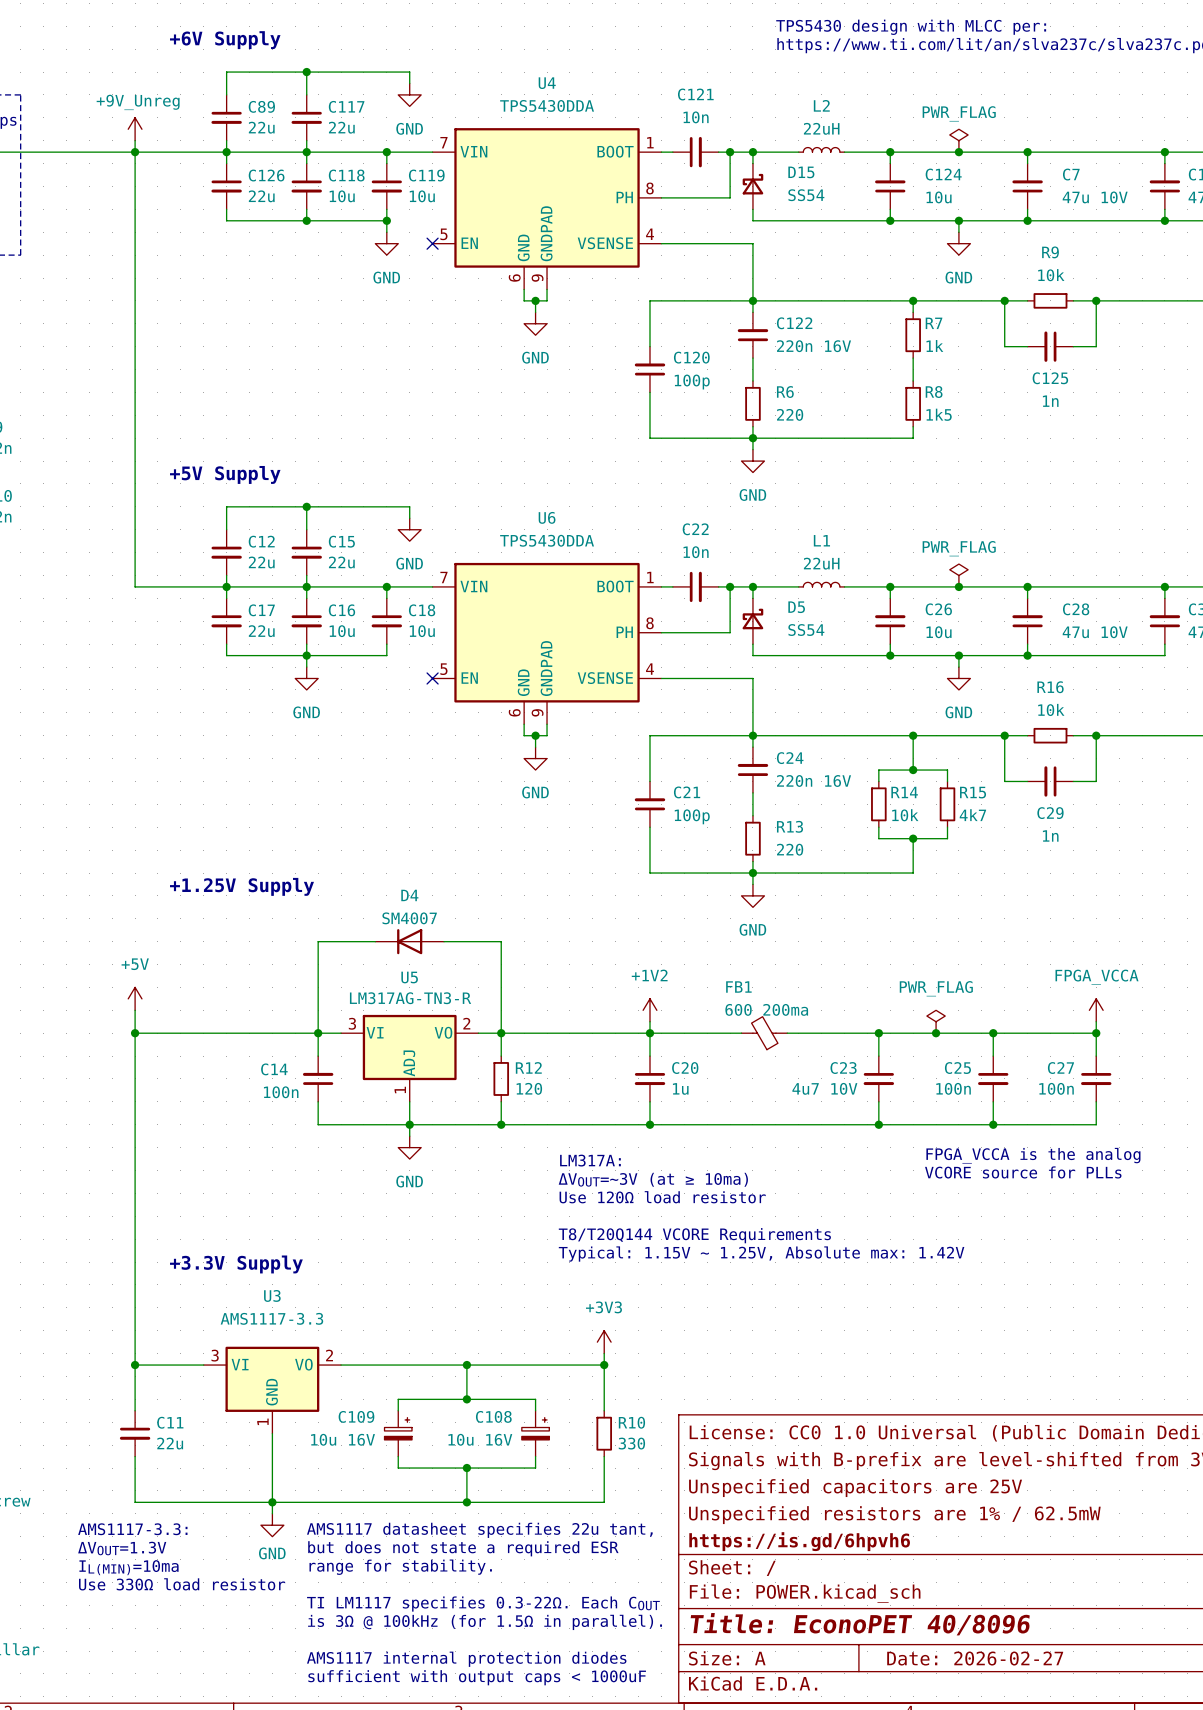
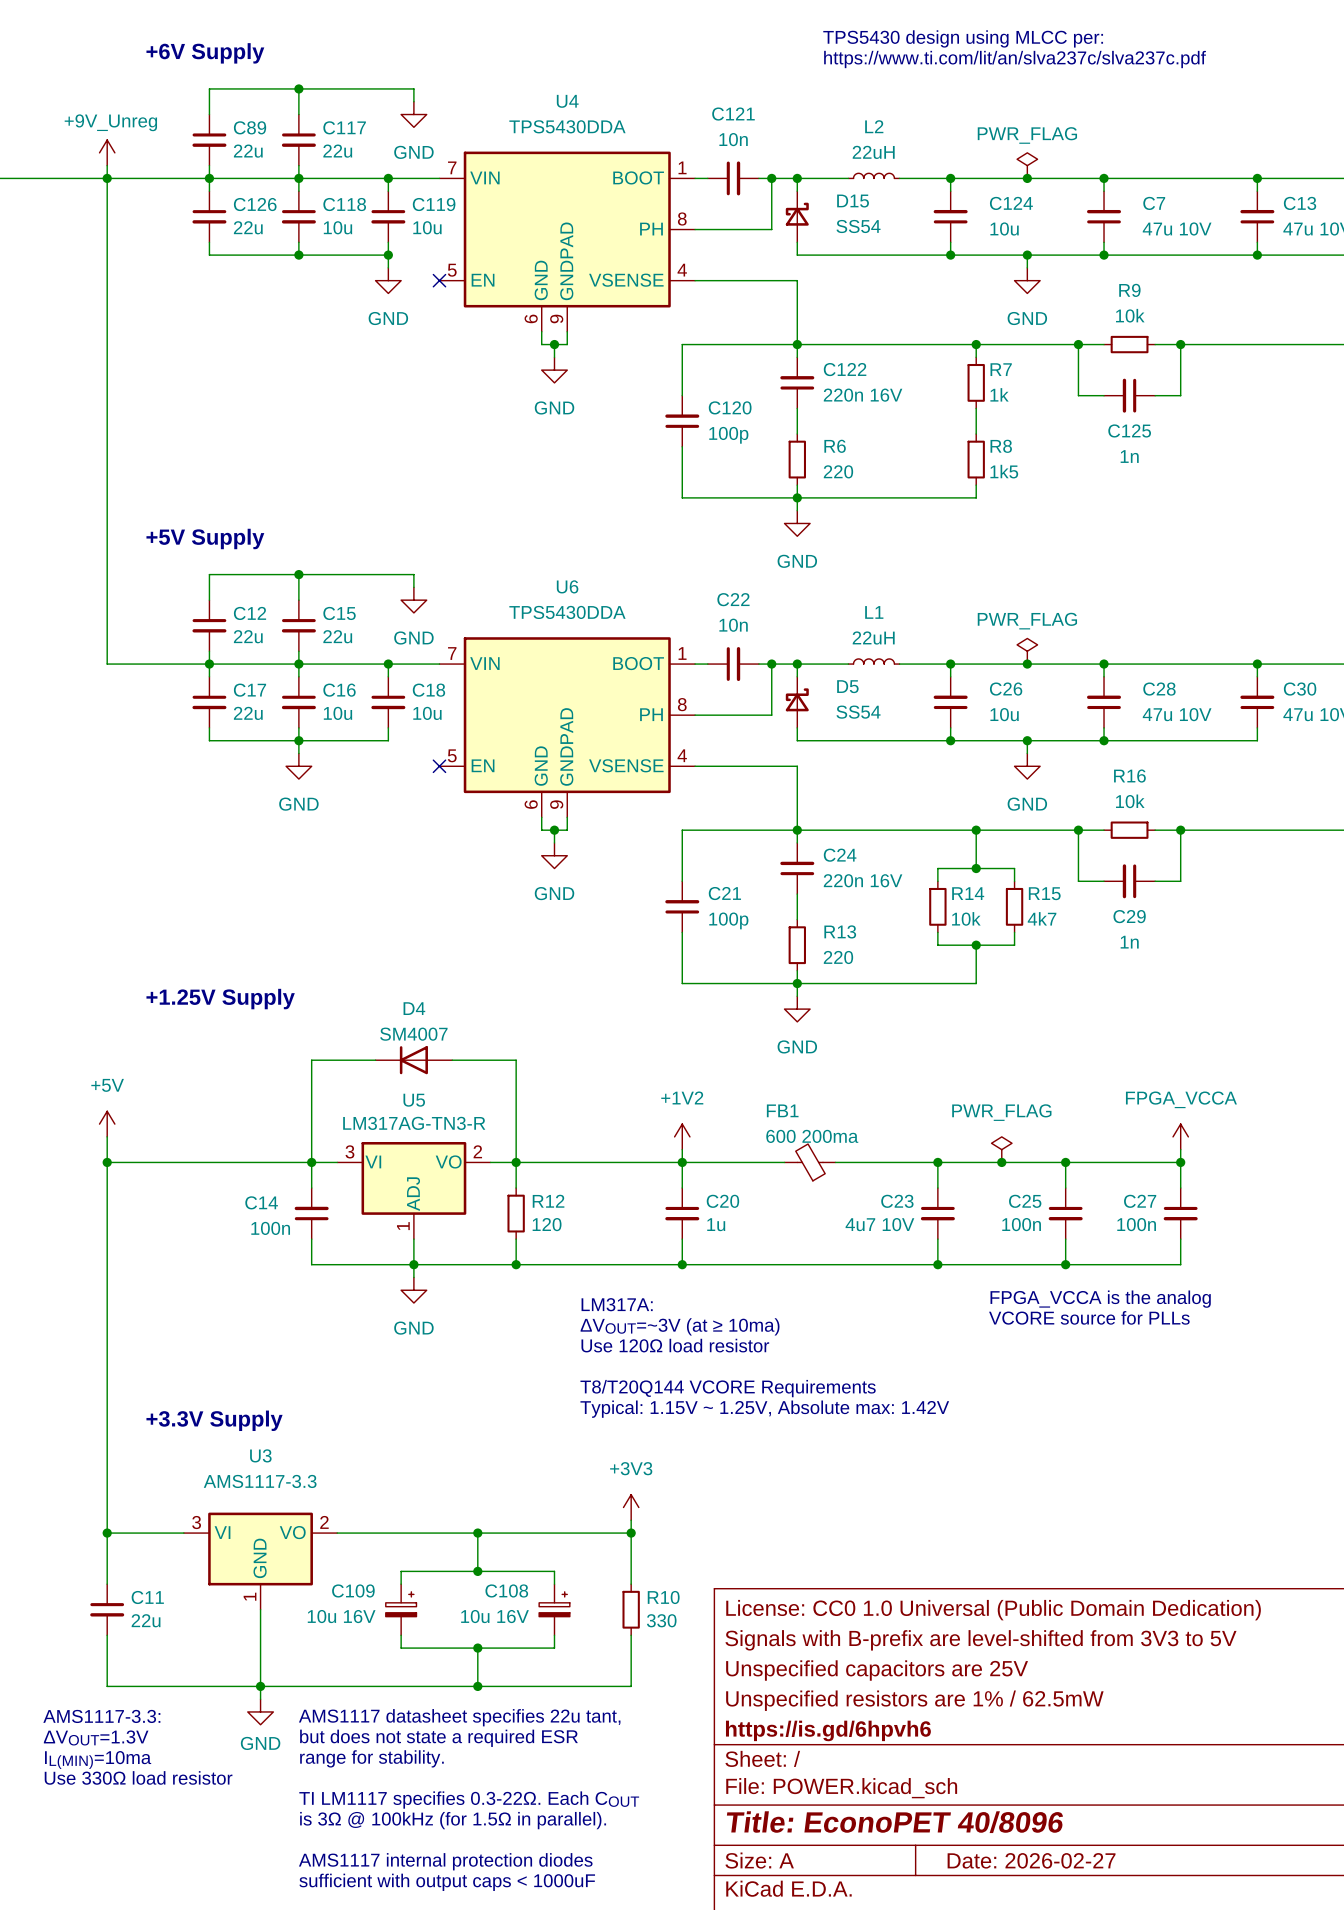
text: TPS5430 design with MLCC per: (911, 27) -> TPS5430 design using MLCC per: (963, 38)

